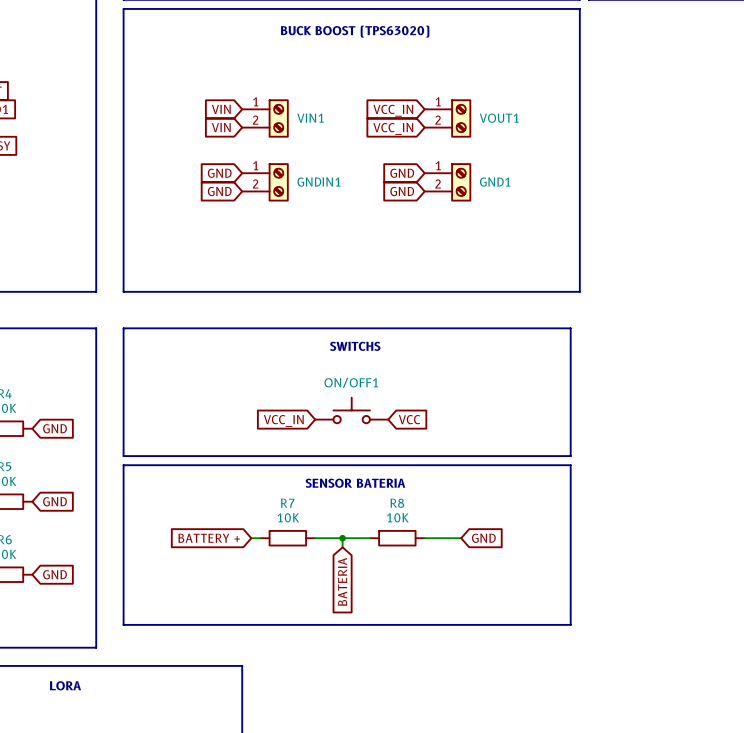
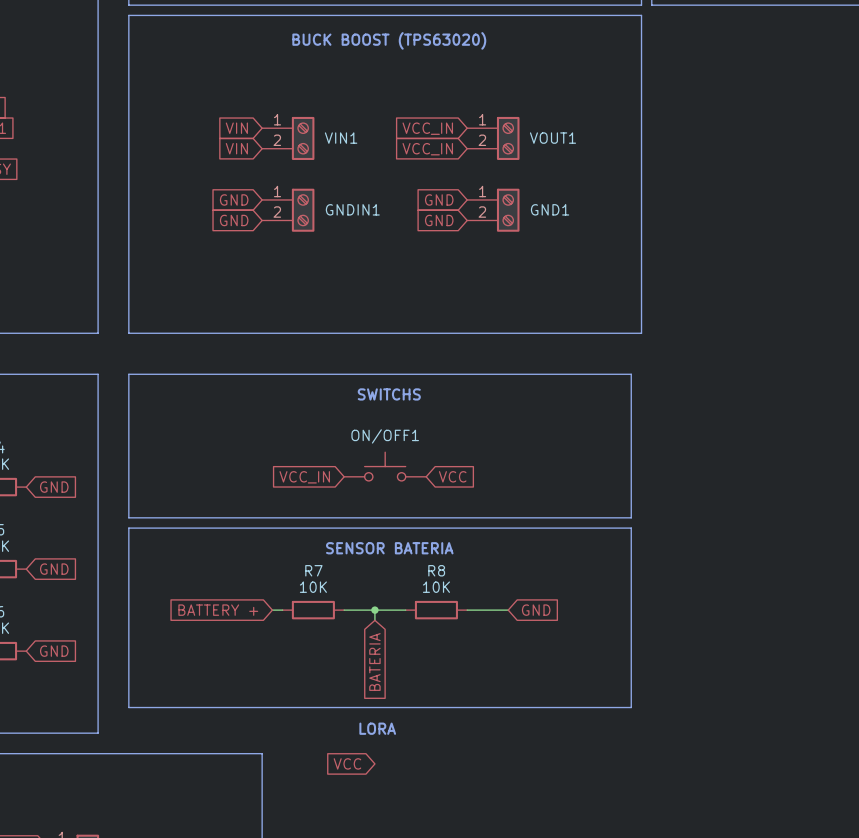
text: none -> LORA (377, 728)
global label: none -> VCC (347, 763)
text: LORA (65, 685) -> none

